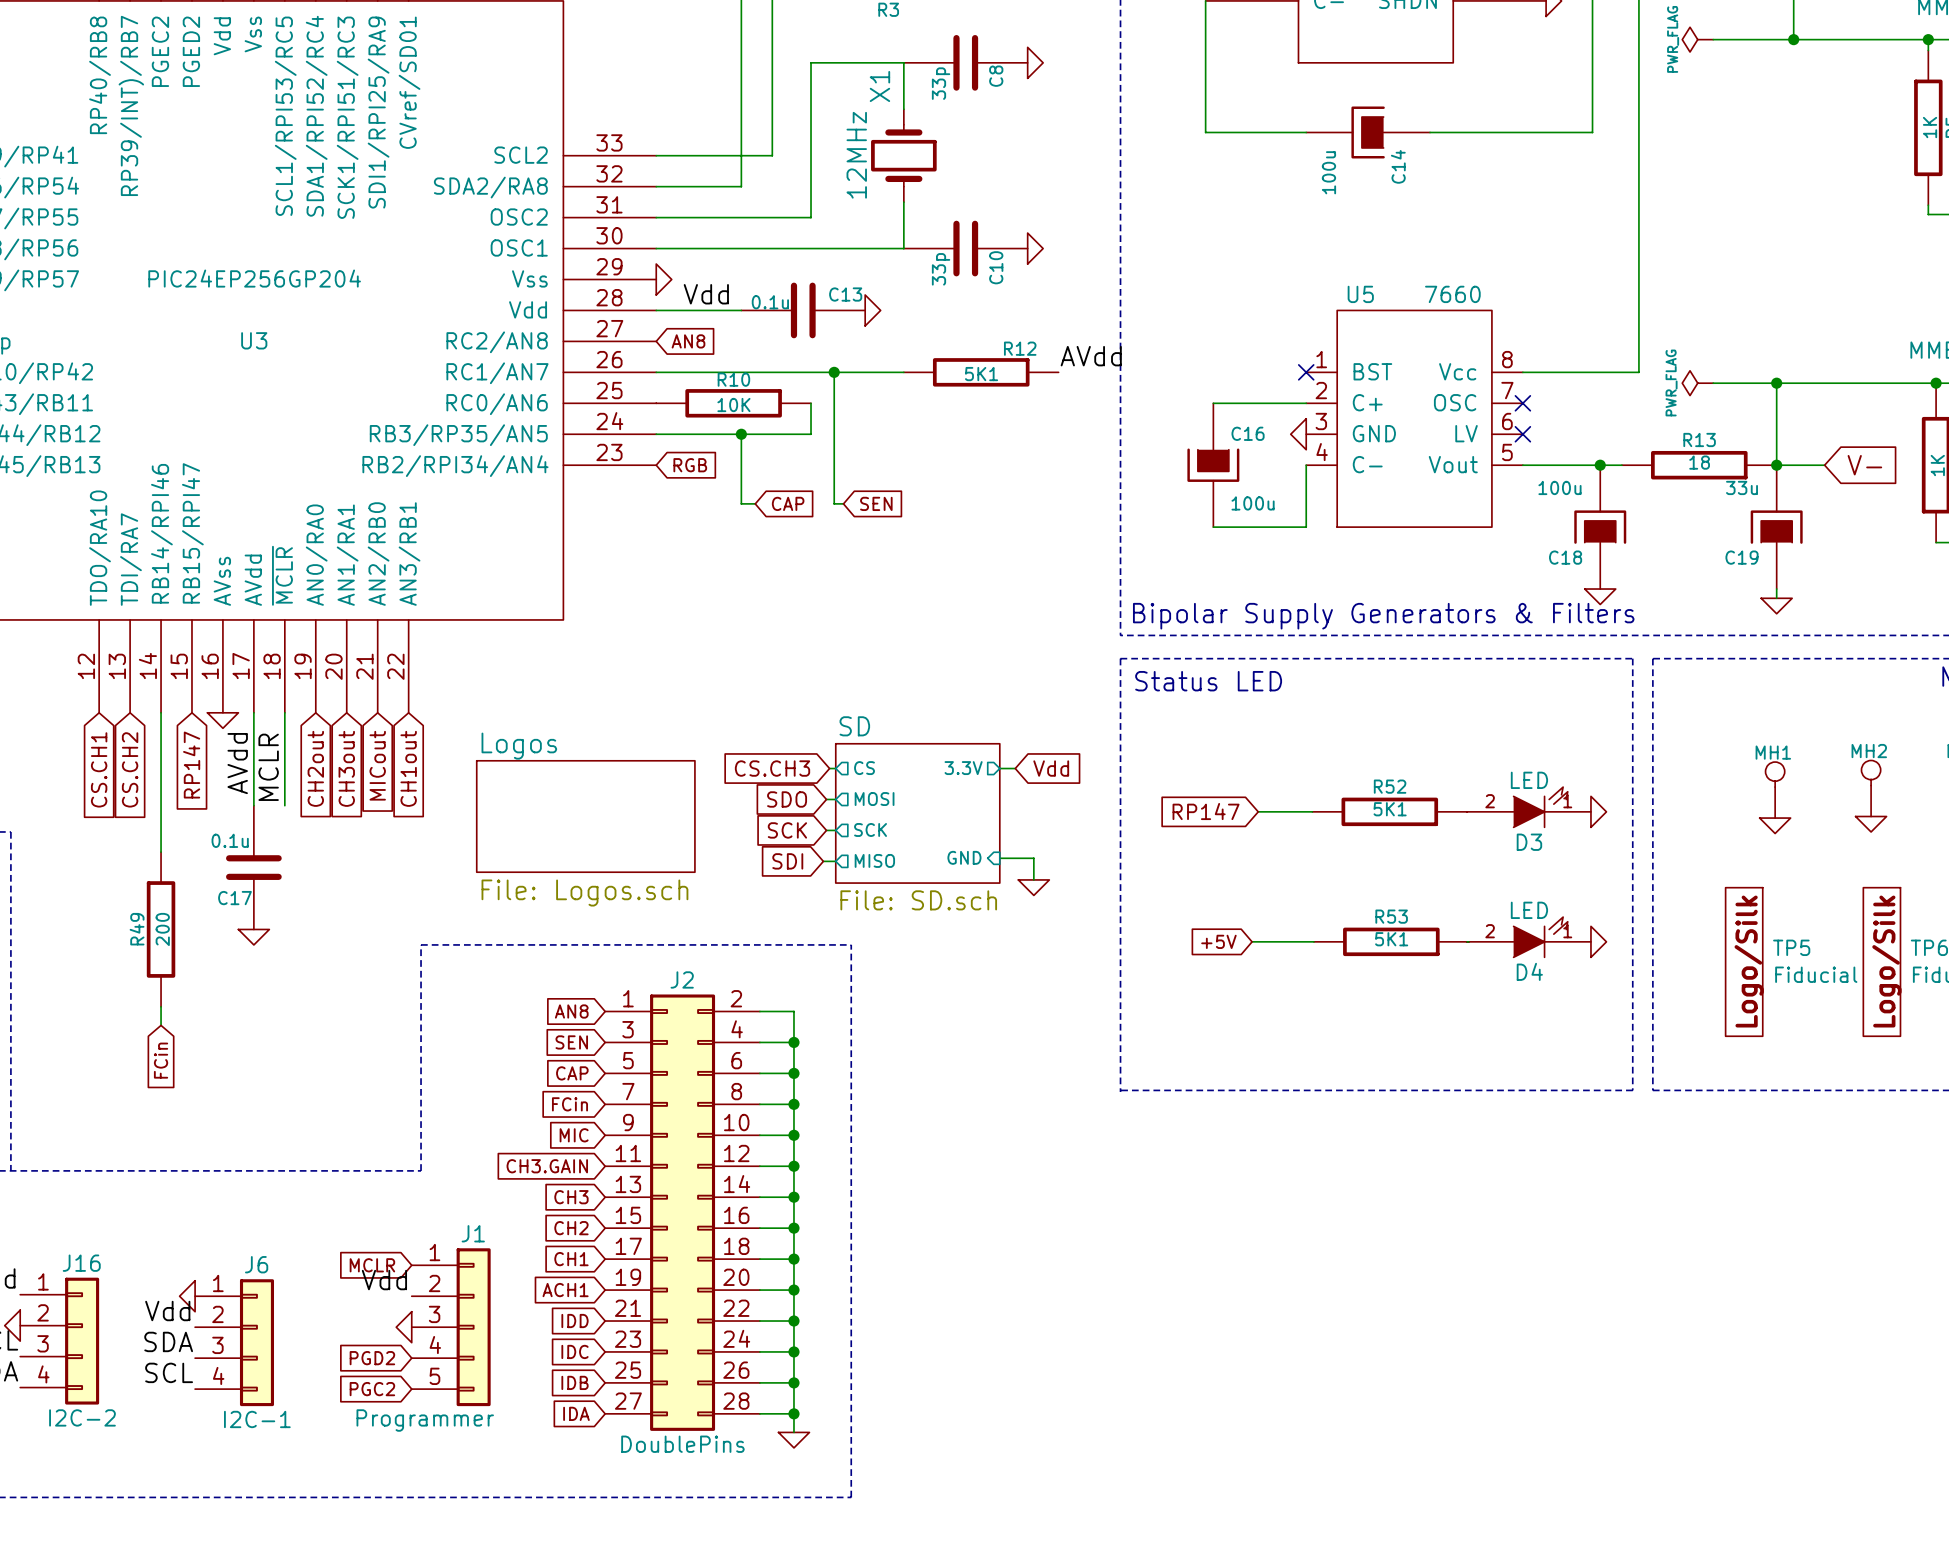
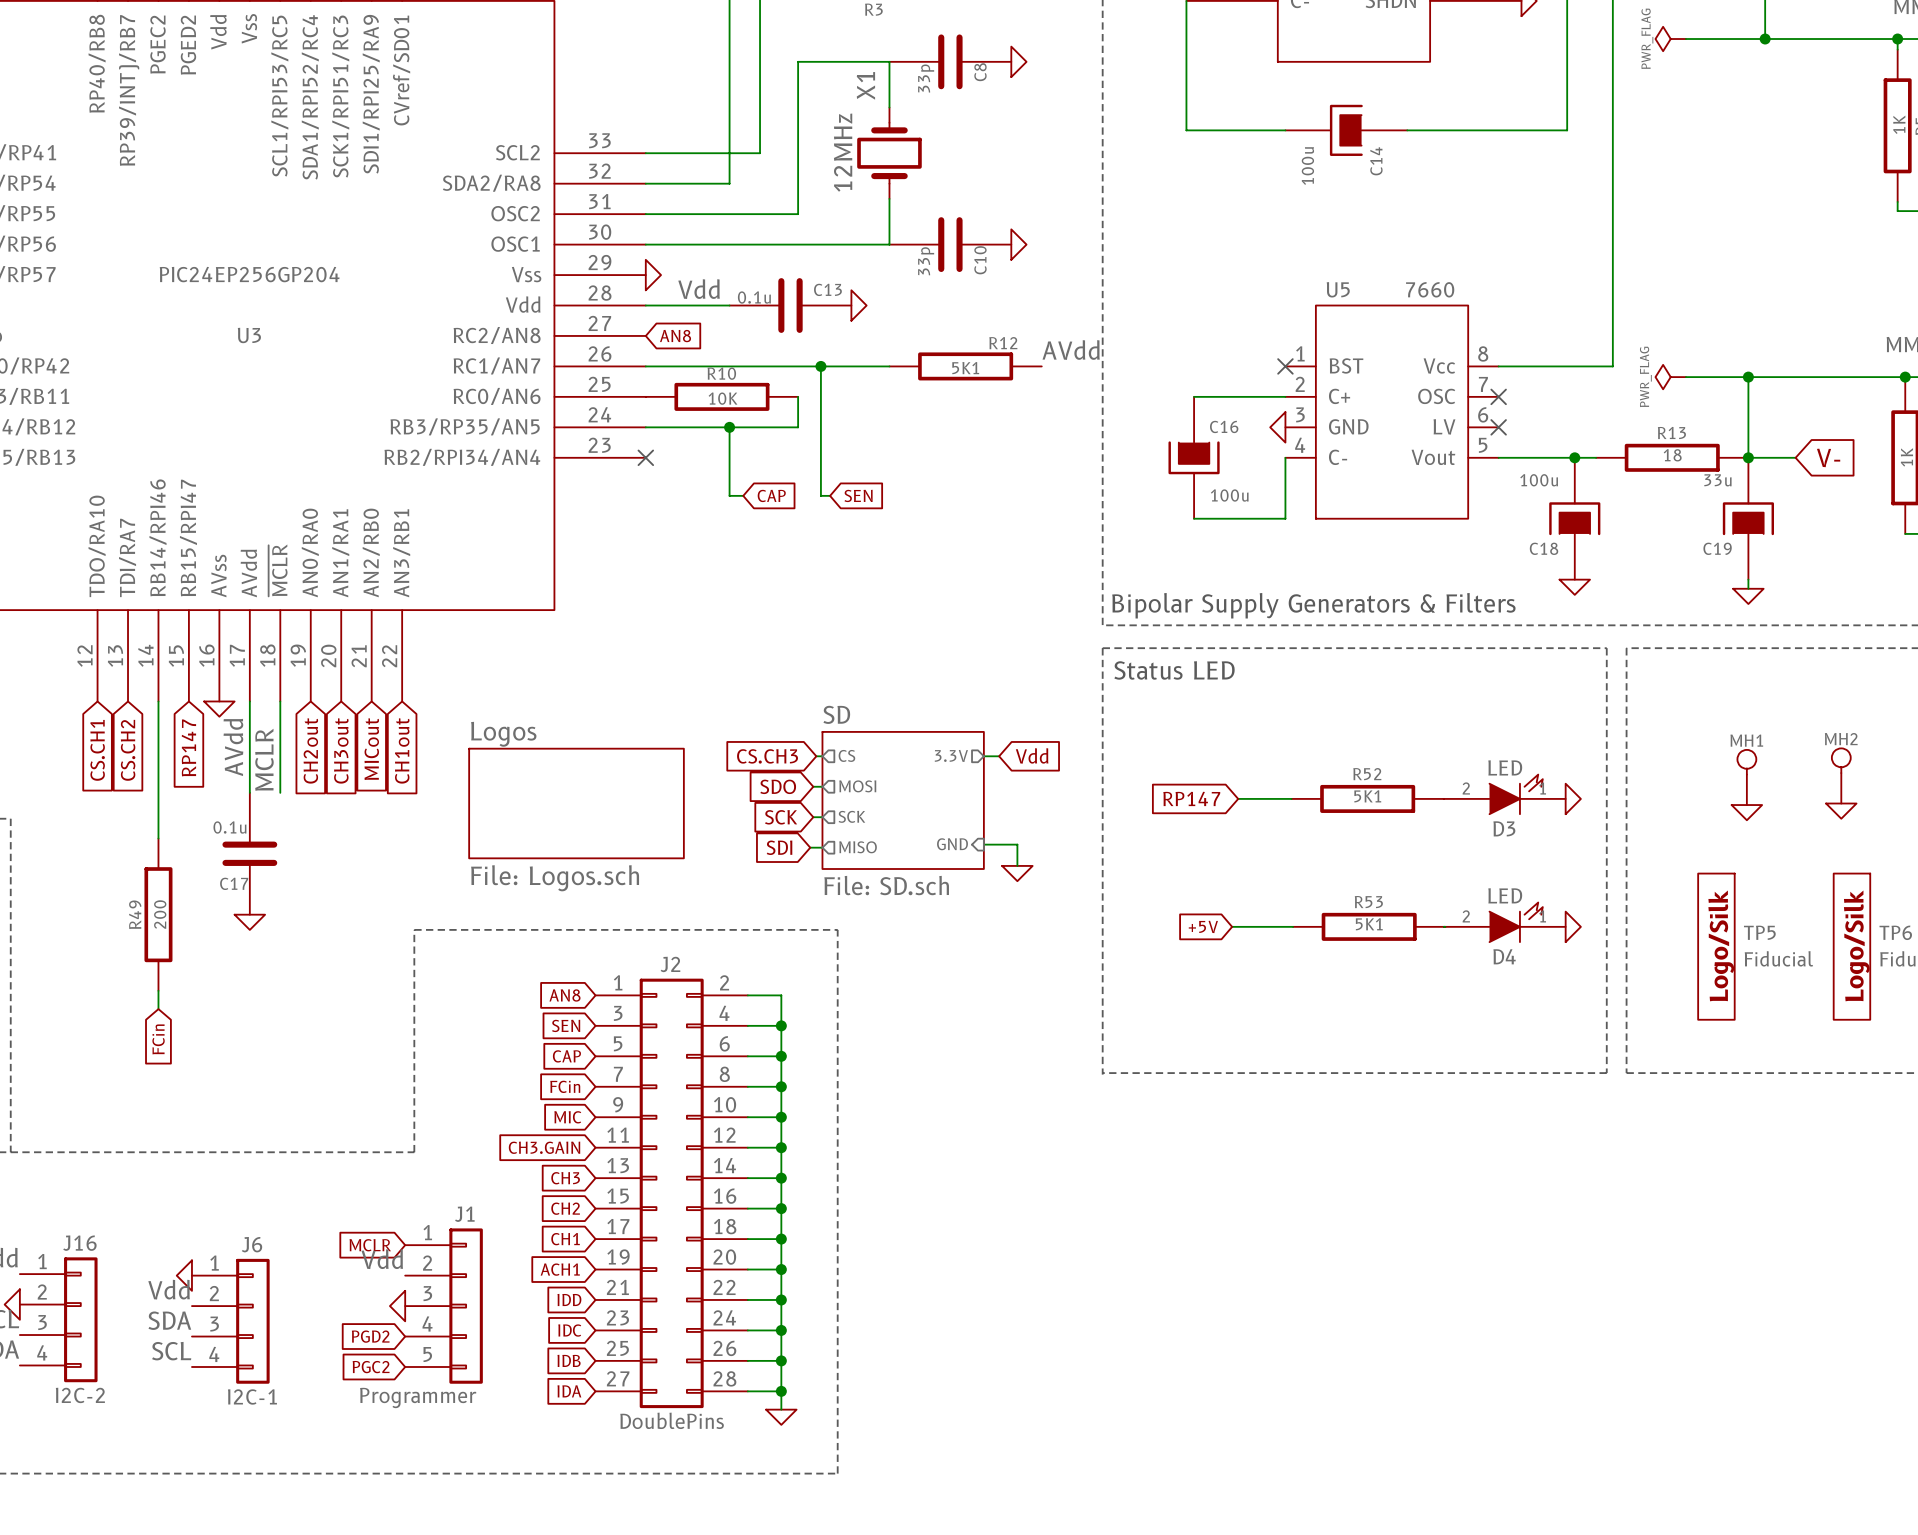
no-connect mark: none -> (645, 457)
global label: RGB (690, 465) -> none

